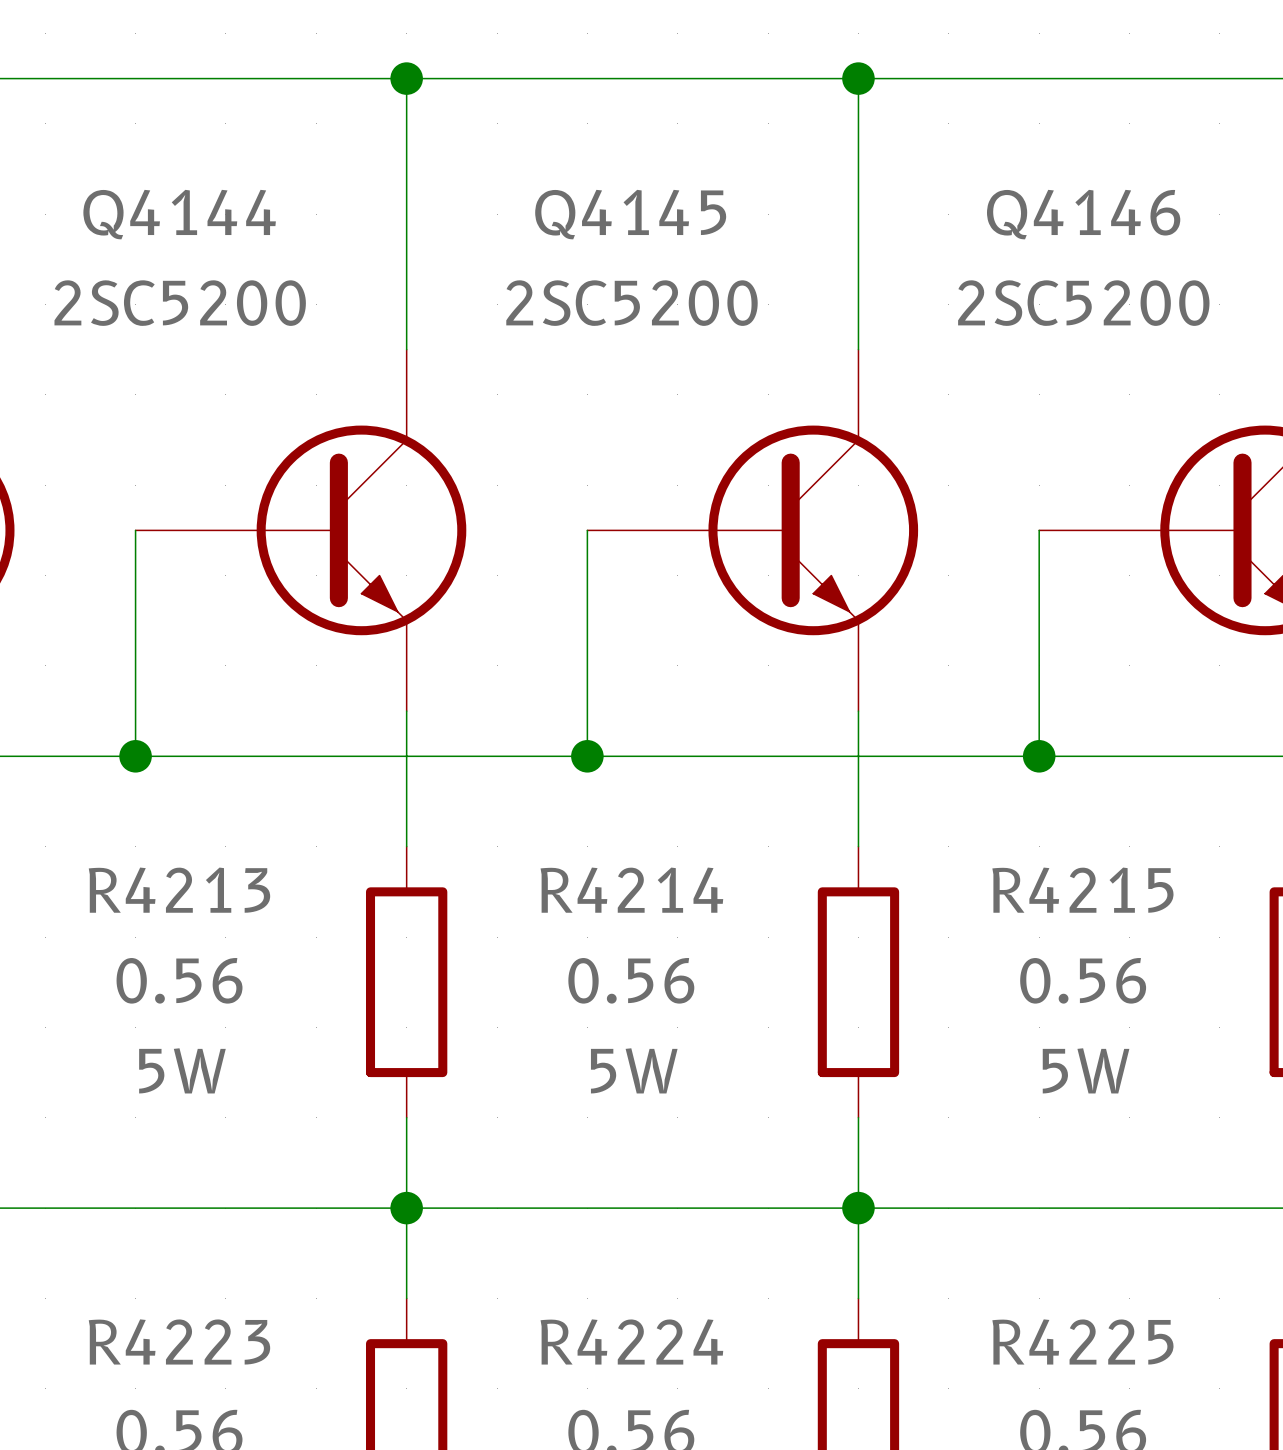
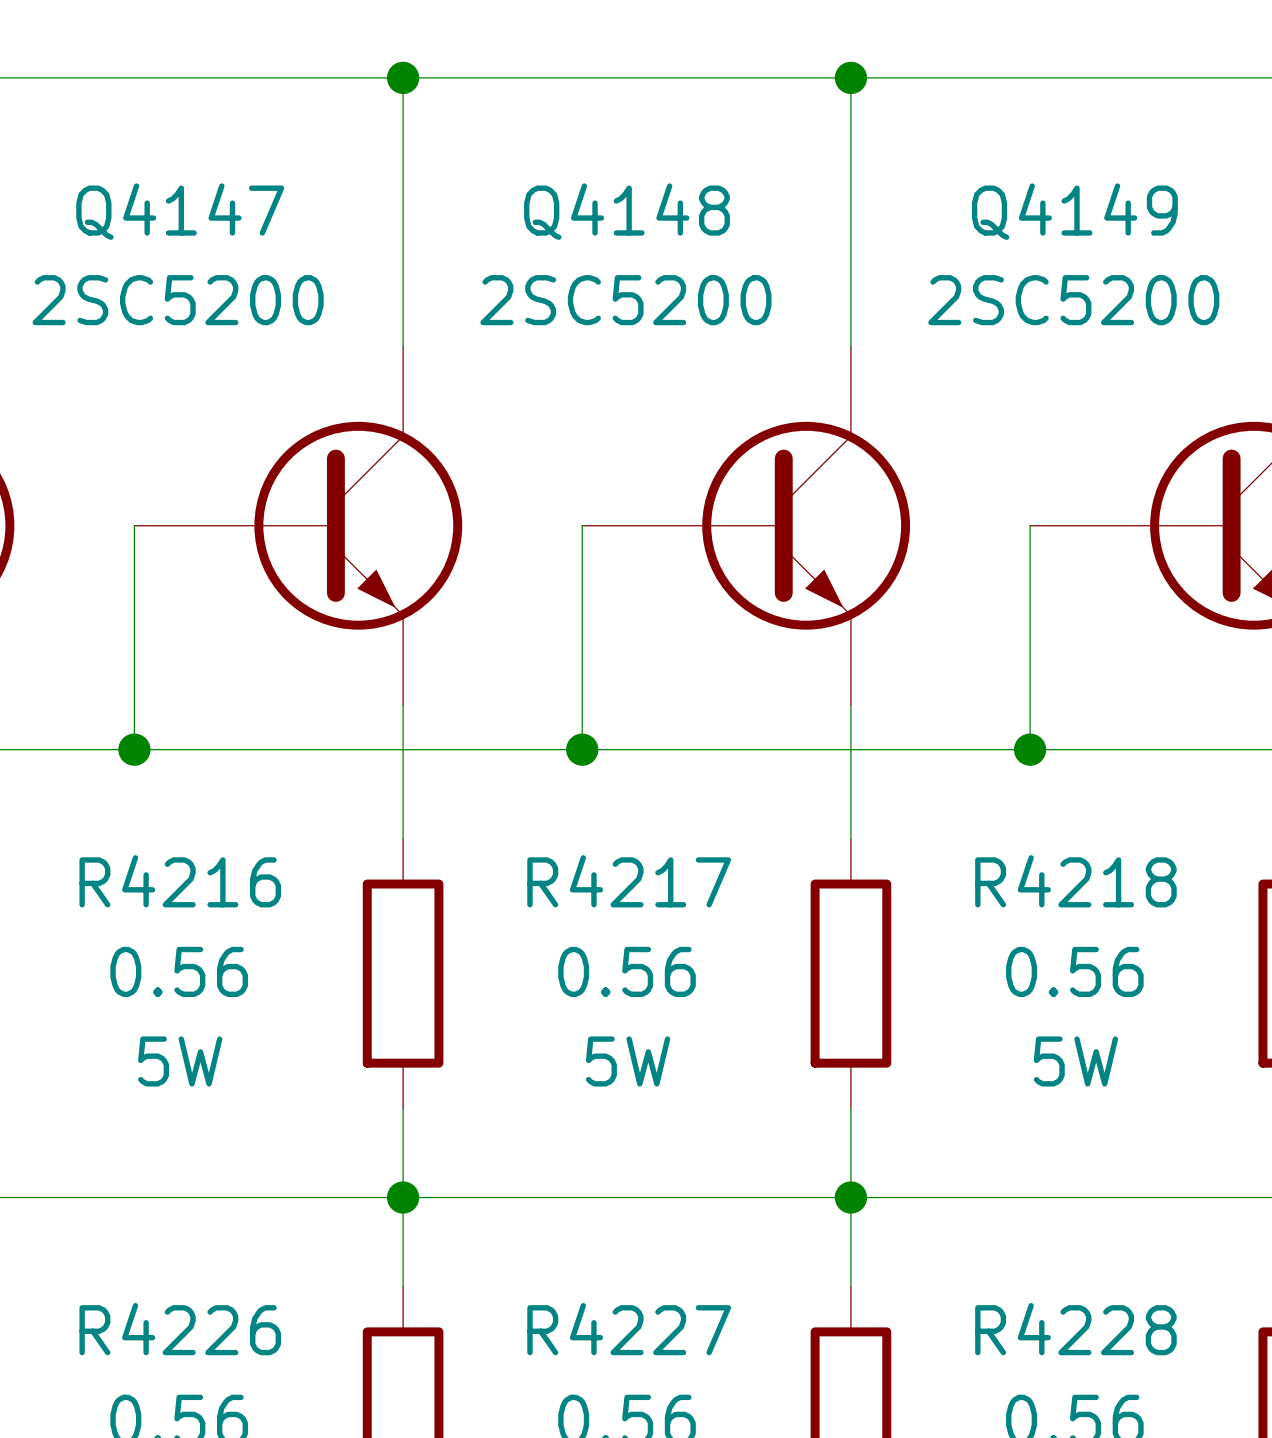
Q4144 name: Q4144 (179, 214) -> Q4147 (180, 211)
Q4145 name: Q4145 (630, 214) -> Q4148 (627, 211)
Q4146 name: Q4146 (1083, 214) -> Q4149 (1074, 211)
R4213 name: R4213 (179, 890) -> R4216 (180, 881)
R4214 name: R4214 (631, 890) -> R4217 (629, 881)
R4215 name: R4215 (1082, 890) -> R4218 (1075, 881)
R4223 name: R4223 (179, 1341) -> R4226 (180, 1329)
R4224 name: R4224 (631, 1341) -> R4227 (629, 1329)
R4225 name: R4225 (1082, 1341) -> R4228 (1075, 1329)

